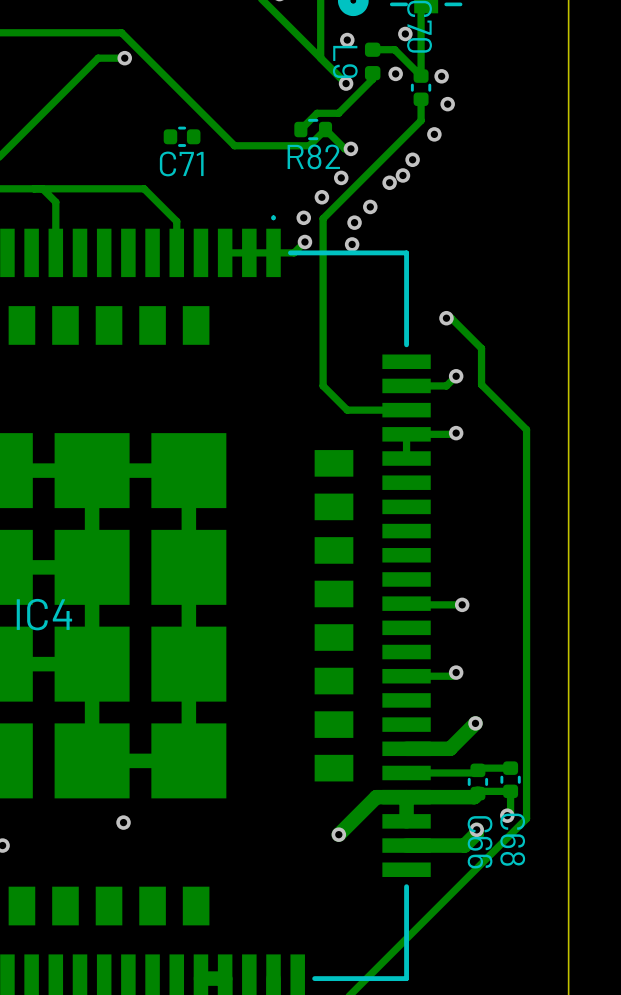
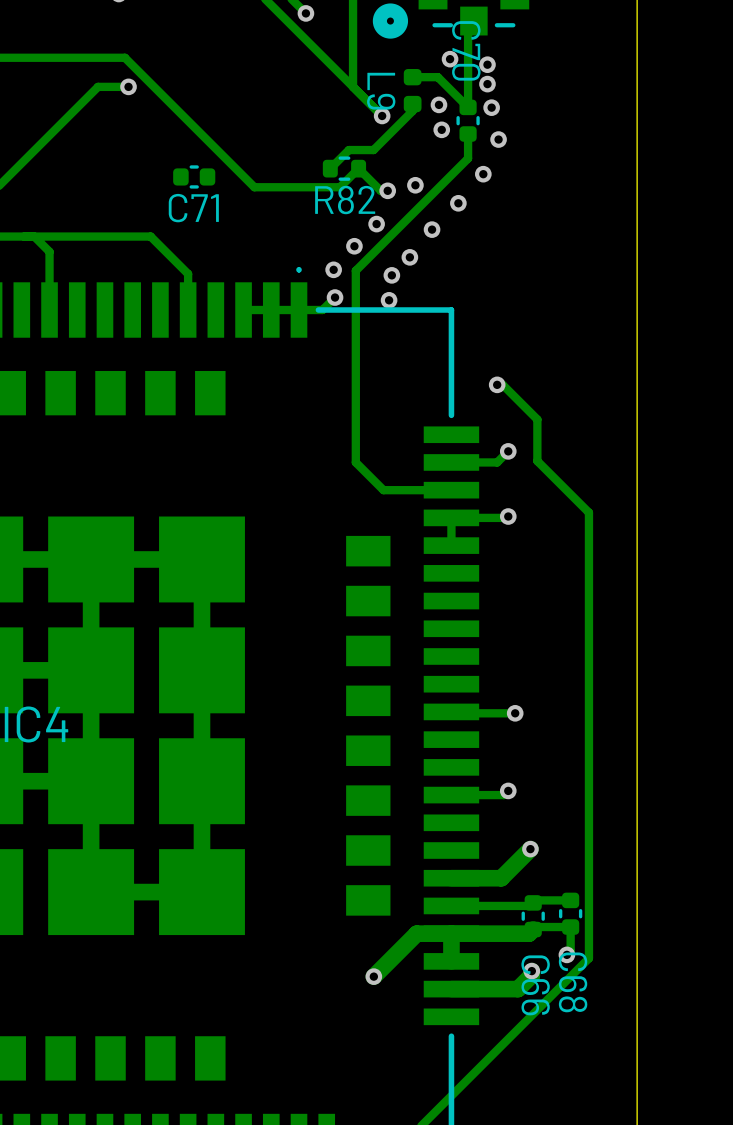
via: none -> (487, 64)
via: (347, 40) -> none
via: none -> (487, 84)
via: none -> (441, 129)
via: none -> (415, 185)
via: (402, 175) -> none
via: (123, 822) -> none

